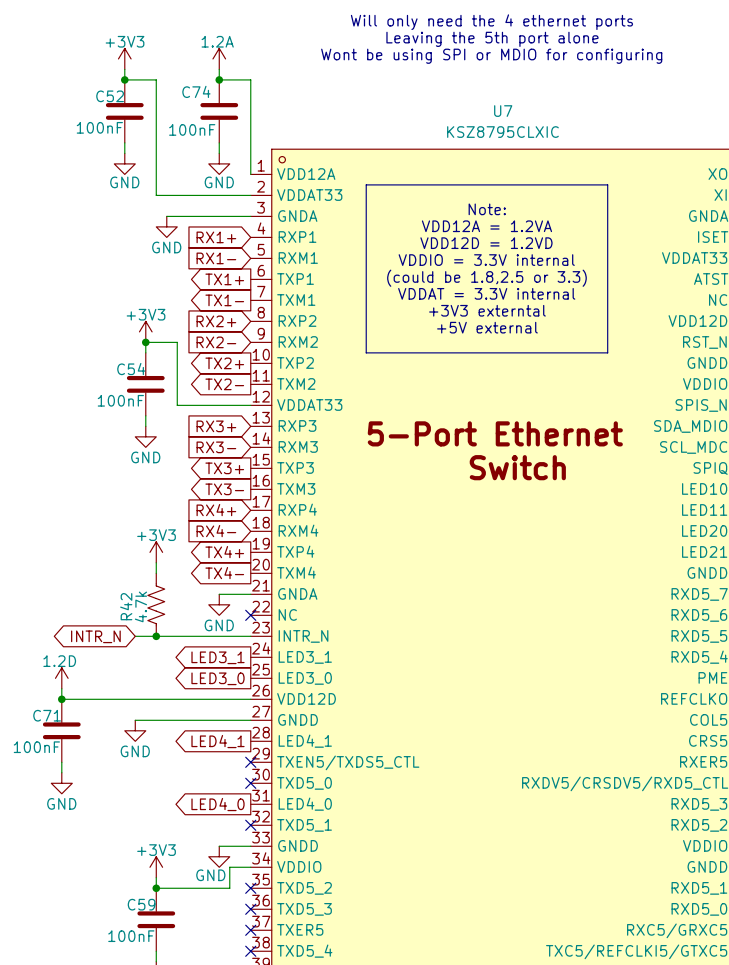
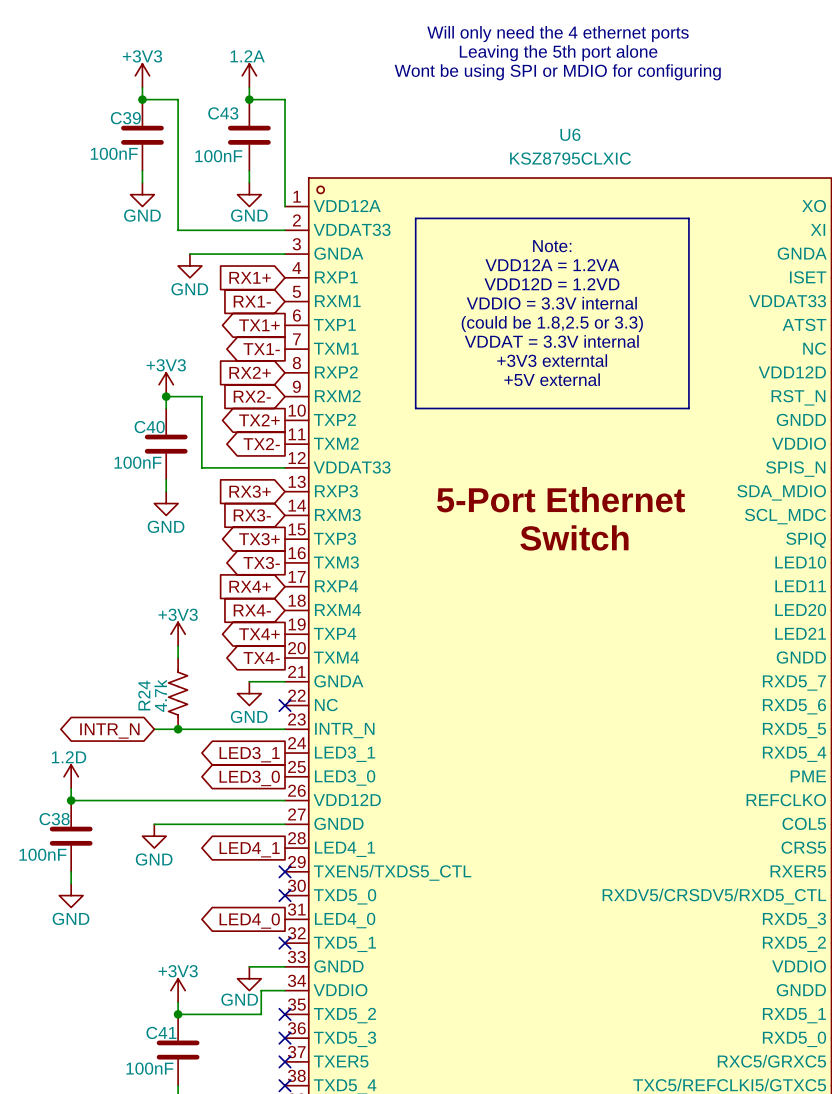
C74 name: C74 (196, 91) -> C43 (223, 113)
C52 name: C52 (110, 96) -> C39 (125, 118)
U7 name: U7 (503, 111) -> U6 (570, 134)
C54 name: C54 (131, 369) -> C40 (149, 427)
R42 name: R42 (126, 606) -> R24 (144, 695)
C71 name: C71 (47, 715) -> C38 (54, 819)
C59 name: C59 (141, 904) -> C41 (161, 1032)

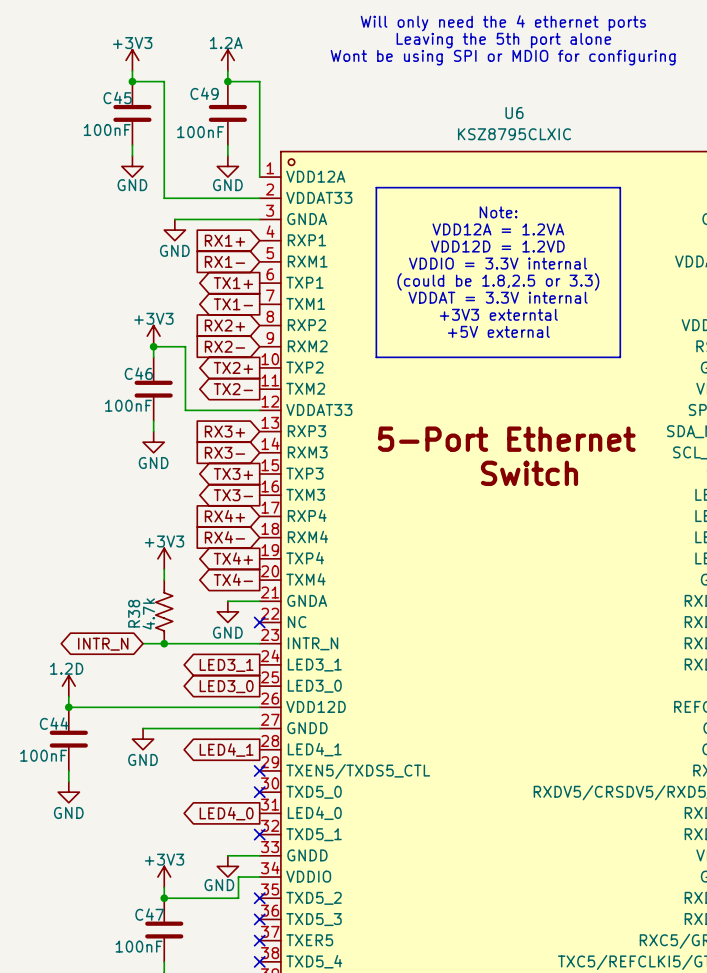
C43 name: C43 (223, 113) -> C49 (204, 93)
C39 name: C39 (125, 118) -> C45 (117, 97)
C40 name: C40 (149, 427) -> C46 (138, 373)
R24 name: R24 (144, 695) -> R38 (134, 613)
C38 name: C38 (54, 819) -> C44 (54, 723)
C41 name: C41 (161, 1032) -> C47 (149, 914)

